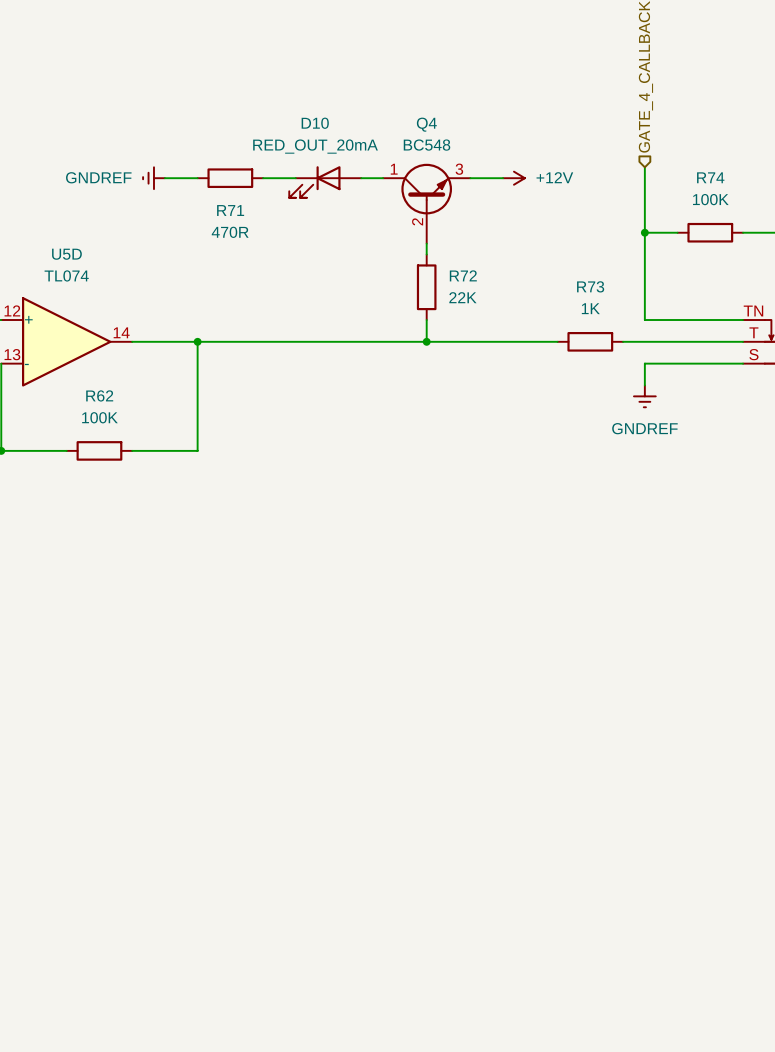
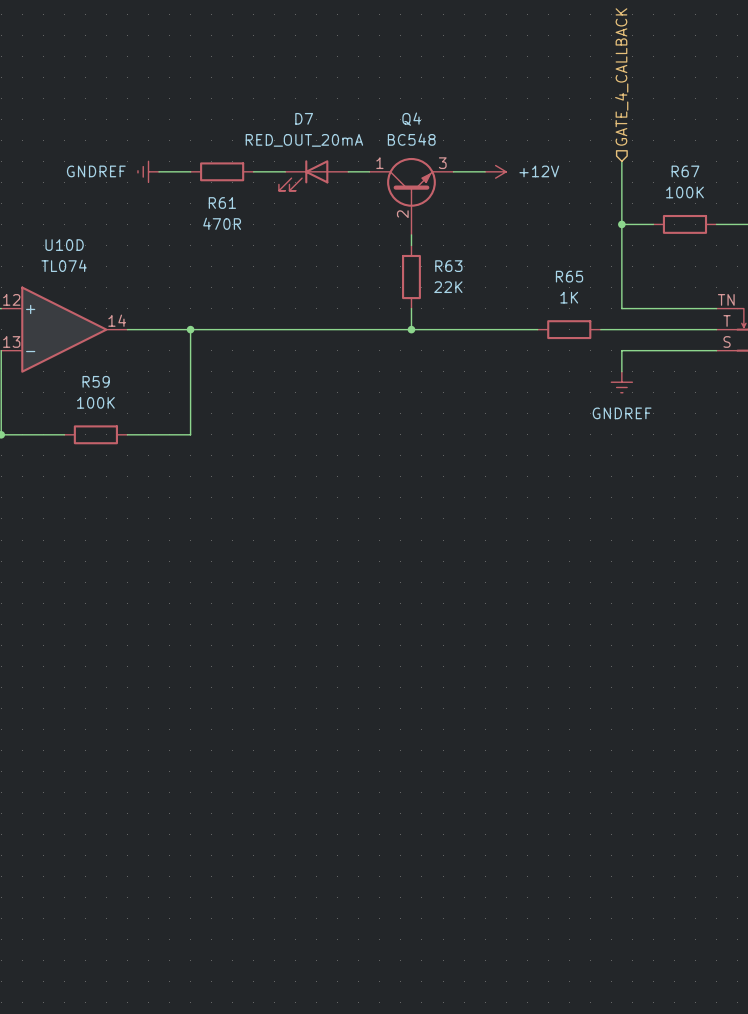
D10 name: D10 (315, 123) -> D7 (304, 118)
R74 name: R74 (710, 177) -> R67 (685, 171)
R71 name: R71 (230, 210) -> R61 (222, 203)
U5D name: U5D (66, 254) -> U10D (64, 245)
R72 name: R72 (463, 275) -> R63 (448, 266)
R73 name: R73 (590, 286) -> R65 (569, 276)
R62 name: R62 (99, 395) -> R59 (96, 381)

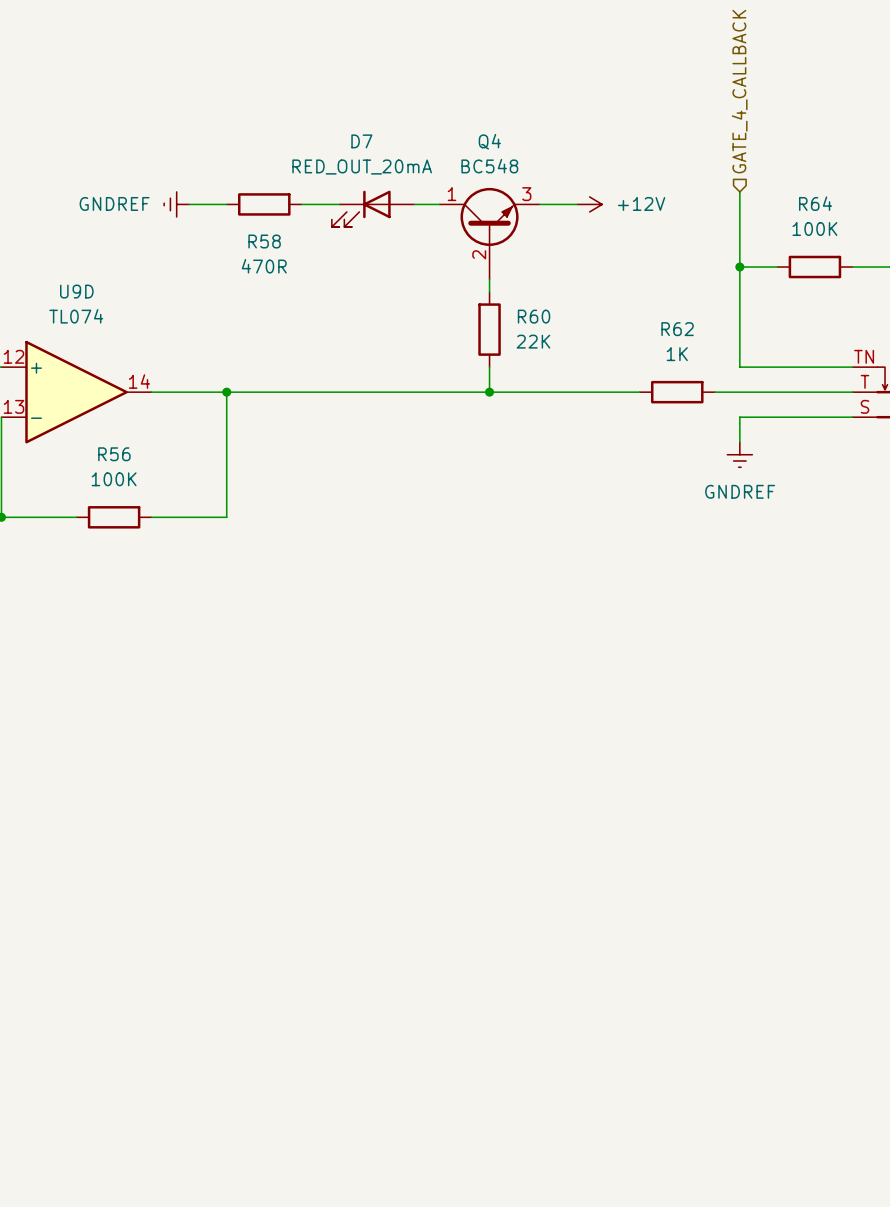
R67 name: R67 (685, 171) -> R64 (815, 203)
R61 name: R61 (222, 203) -> R58 (264, 241)
U10D name: U10D (64, 245) -> U9D (76, 291)
R63 name: R63 (448, 266) -> R60 (534, 316)
R65 name: R65 (569, 276) -> R62 (677, 329)
R59 name: R59 (96, 381) -> R56 (114, 454)

